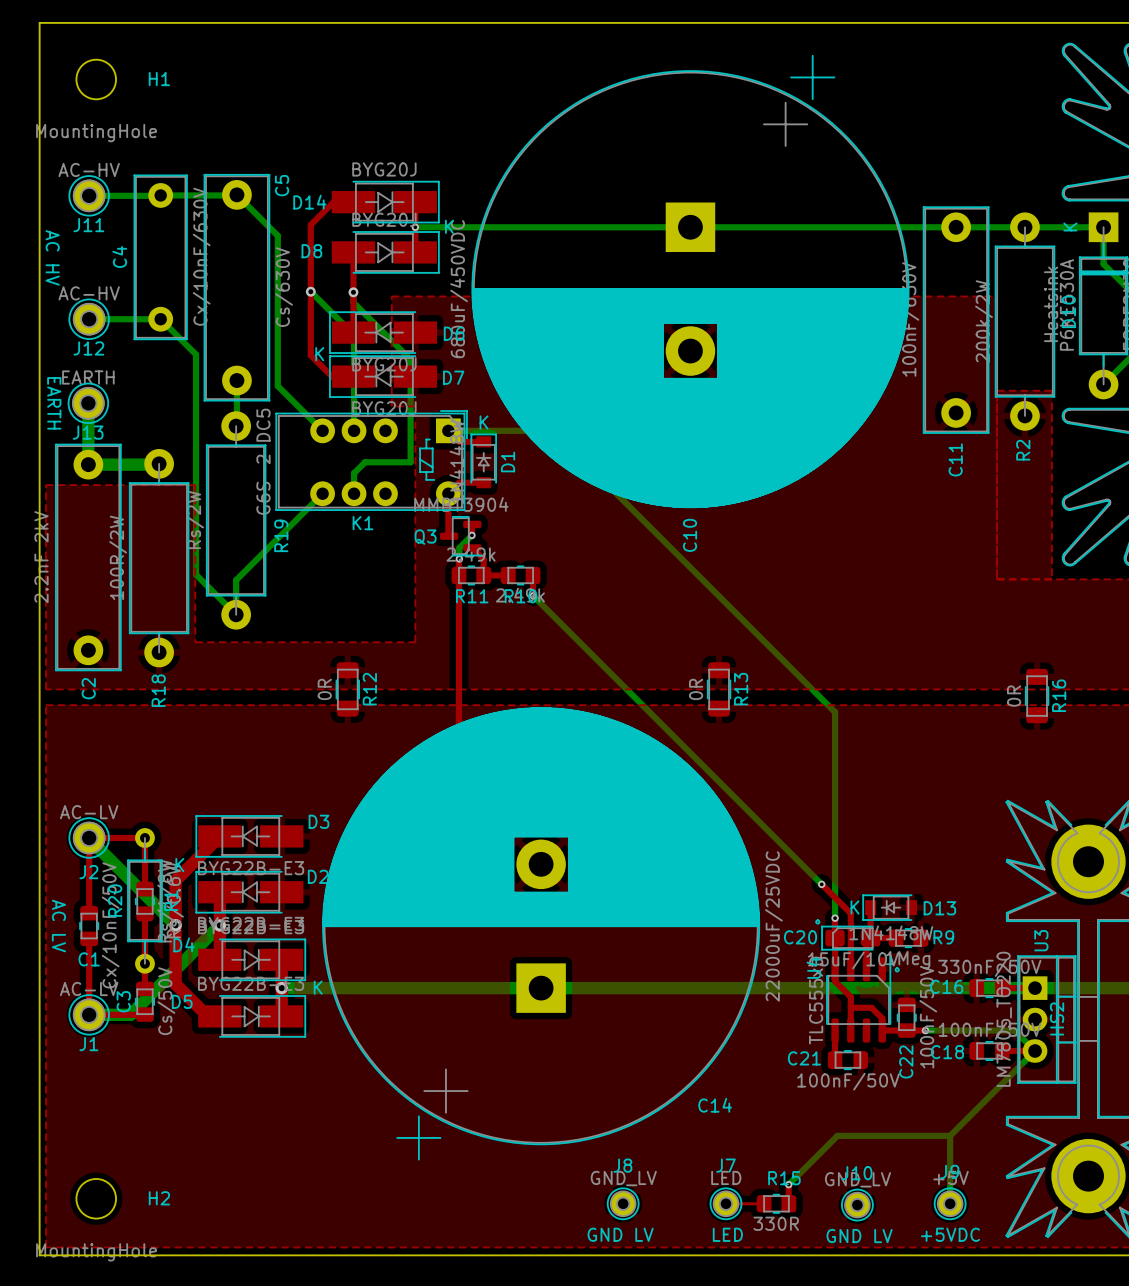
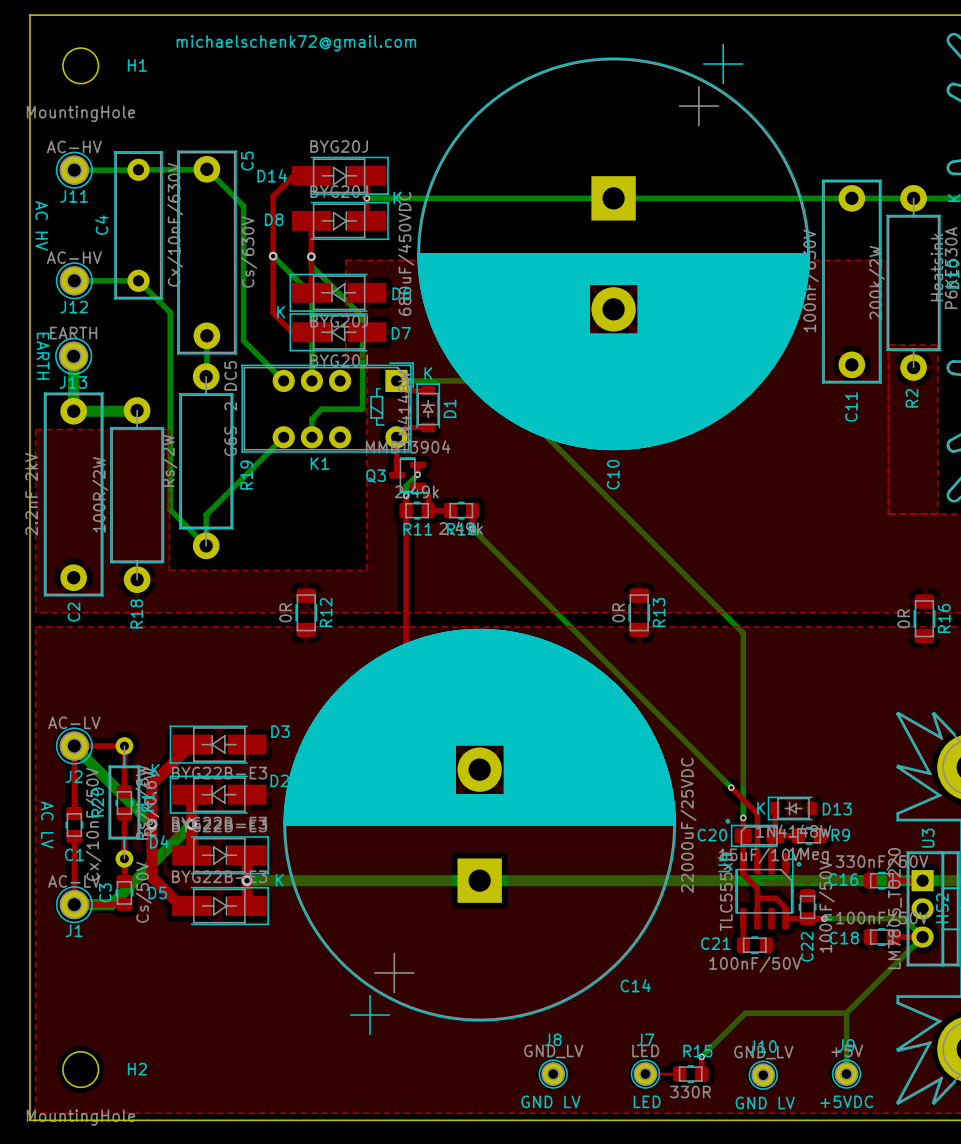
text: none -> michaelschenk72@gmail.com (296, 43)

